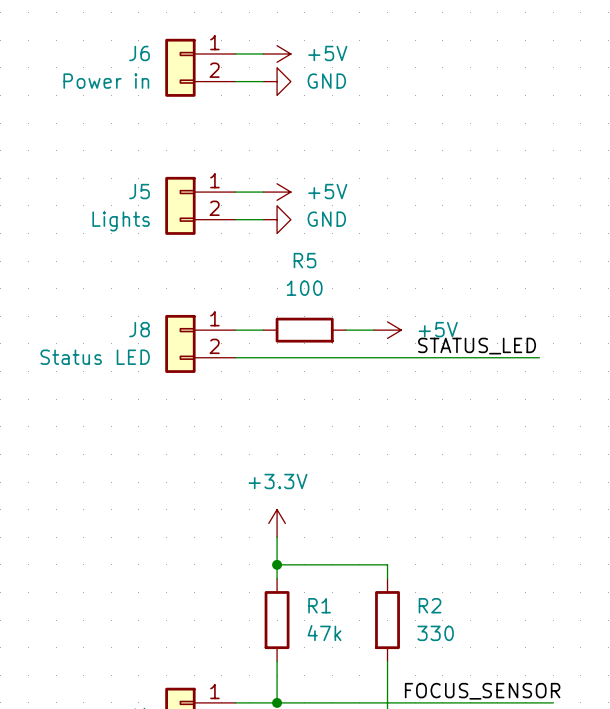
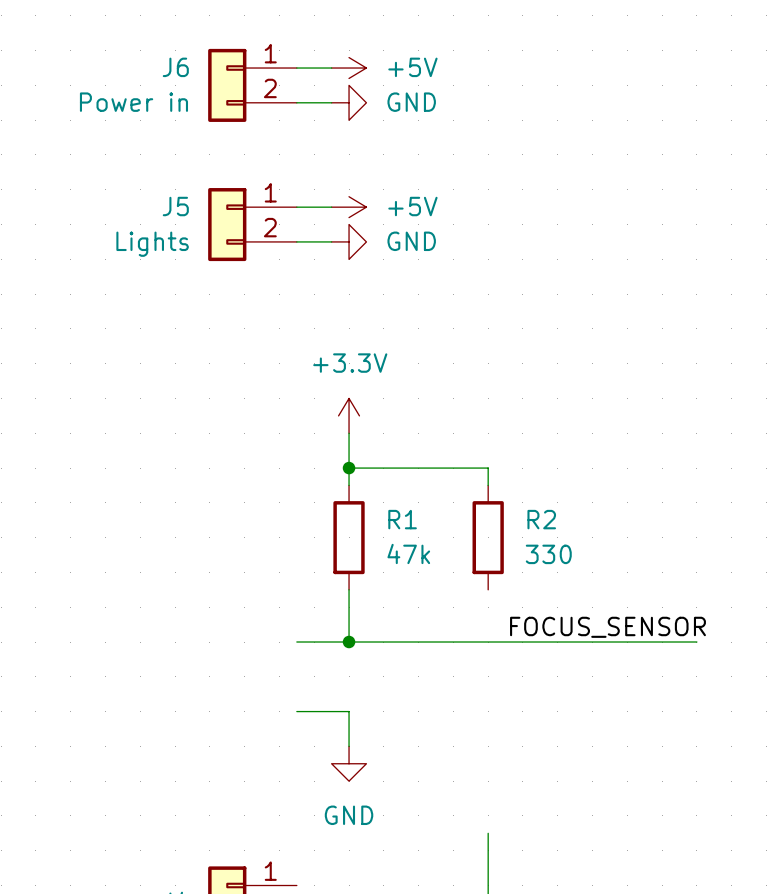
power symbol: +5V (277, 192) -> GND (349, 241)
J5 position: (200, 205) -> (252, 224)
wire: (235, 219) (263, 219) -> (296, 207) (331, 207)
power symbol: GND (277, 219) -> none
wire: (235, 330) (263, 330) -> none
R5: 100 (304, 330) -> none
wire: (346, 330) (373, 330) -> none
power symbol position: +5V (387, 330) -> +5V (349, 207)
J8: Status LED (200, 343) -> none
wire: none -> (349, 433) (349, 485)
label: STATUS_LED (477, 346) -> none
wire: (235, 357) (539, 357) -> none
wire: none -> (349, 468) (488, 468) (488, 485)
junction: none -> (349, 468)
power symbol position: +3.3V (277, 523) -> +3.3V (349, 415)
wire: (277, 537) (277, 564) (387, 564) (387, 578) -> none
wire: none -> (296, 711) (349, 711)
junction position: (277, 564) -> (349, 642)
power symbol: none -> GND (349, 763)
R1 position: (277, 620) -> (349, 537)
R2 position: (387, 620) -> (488, 537)
wire: (277, 661) (277, 702) -> (349, 589) (349, 642)
label position: FOCUS_SENSOR (482, 691) -> FOCUS_SENSOR (607, 627)
wire: (235, 702) (553, 702) -> (296, 642) (696, 642)
junction: (277, 702) -> none

